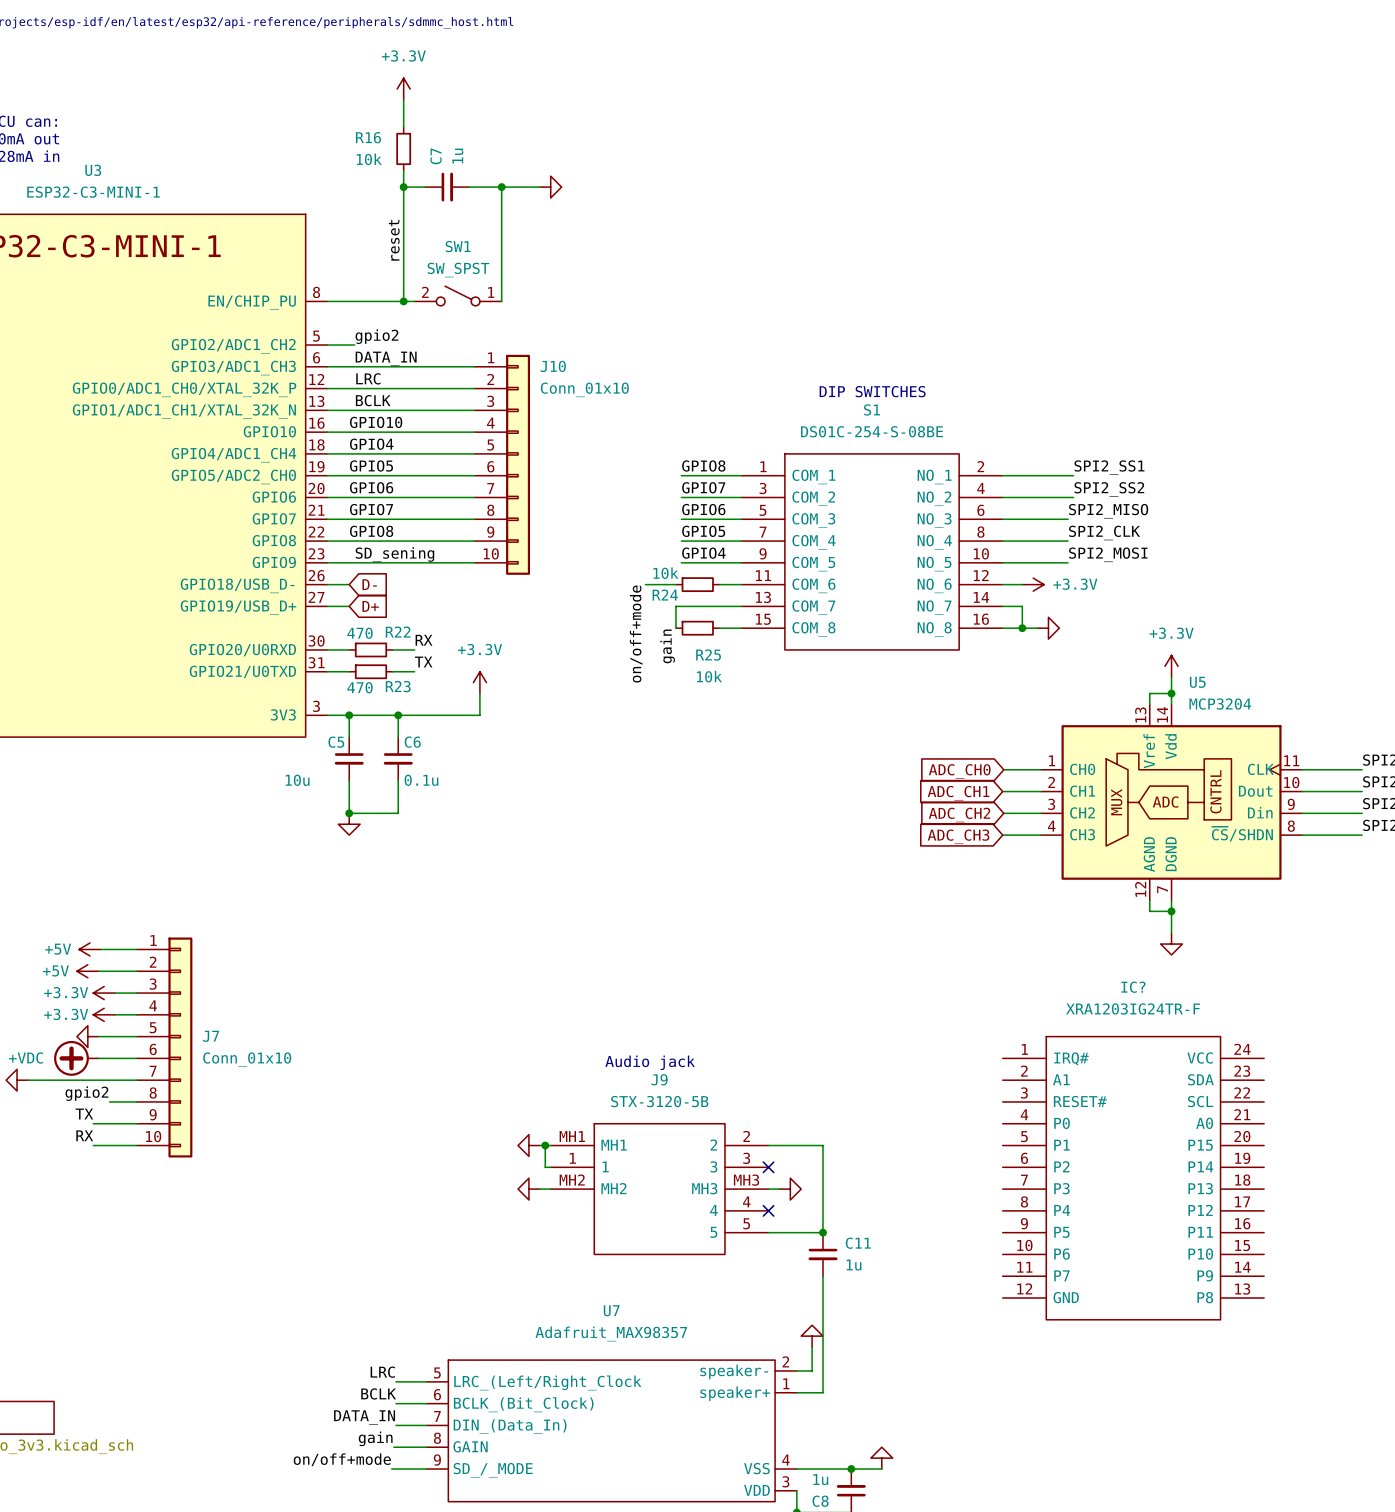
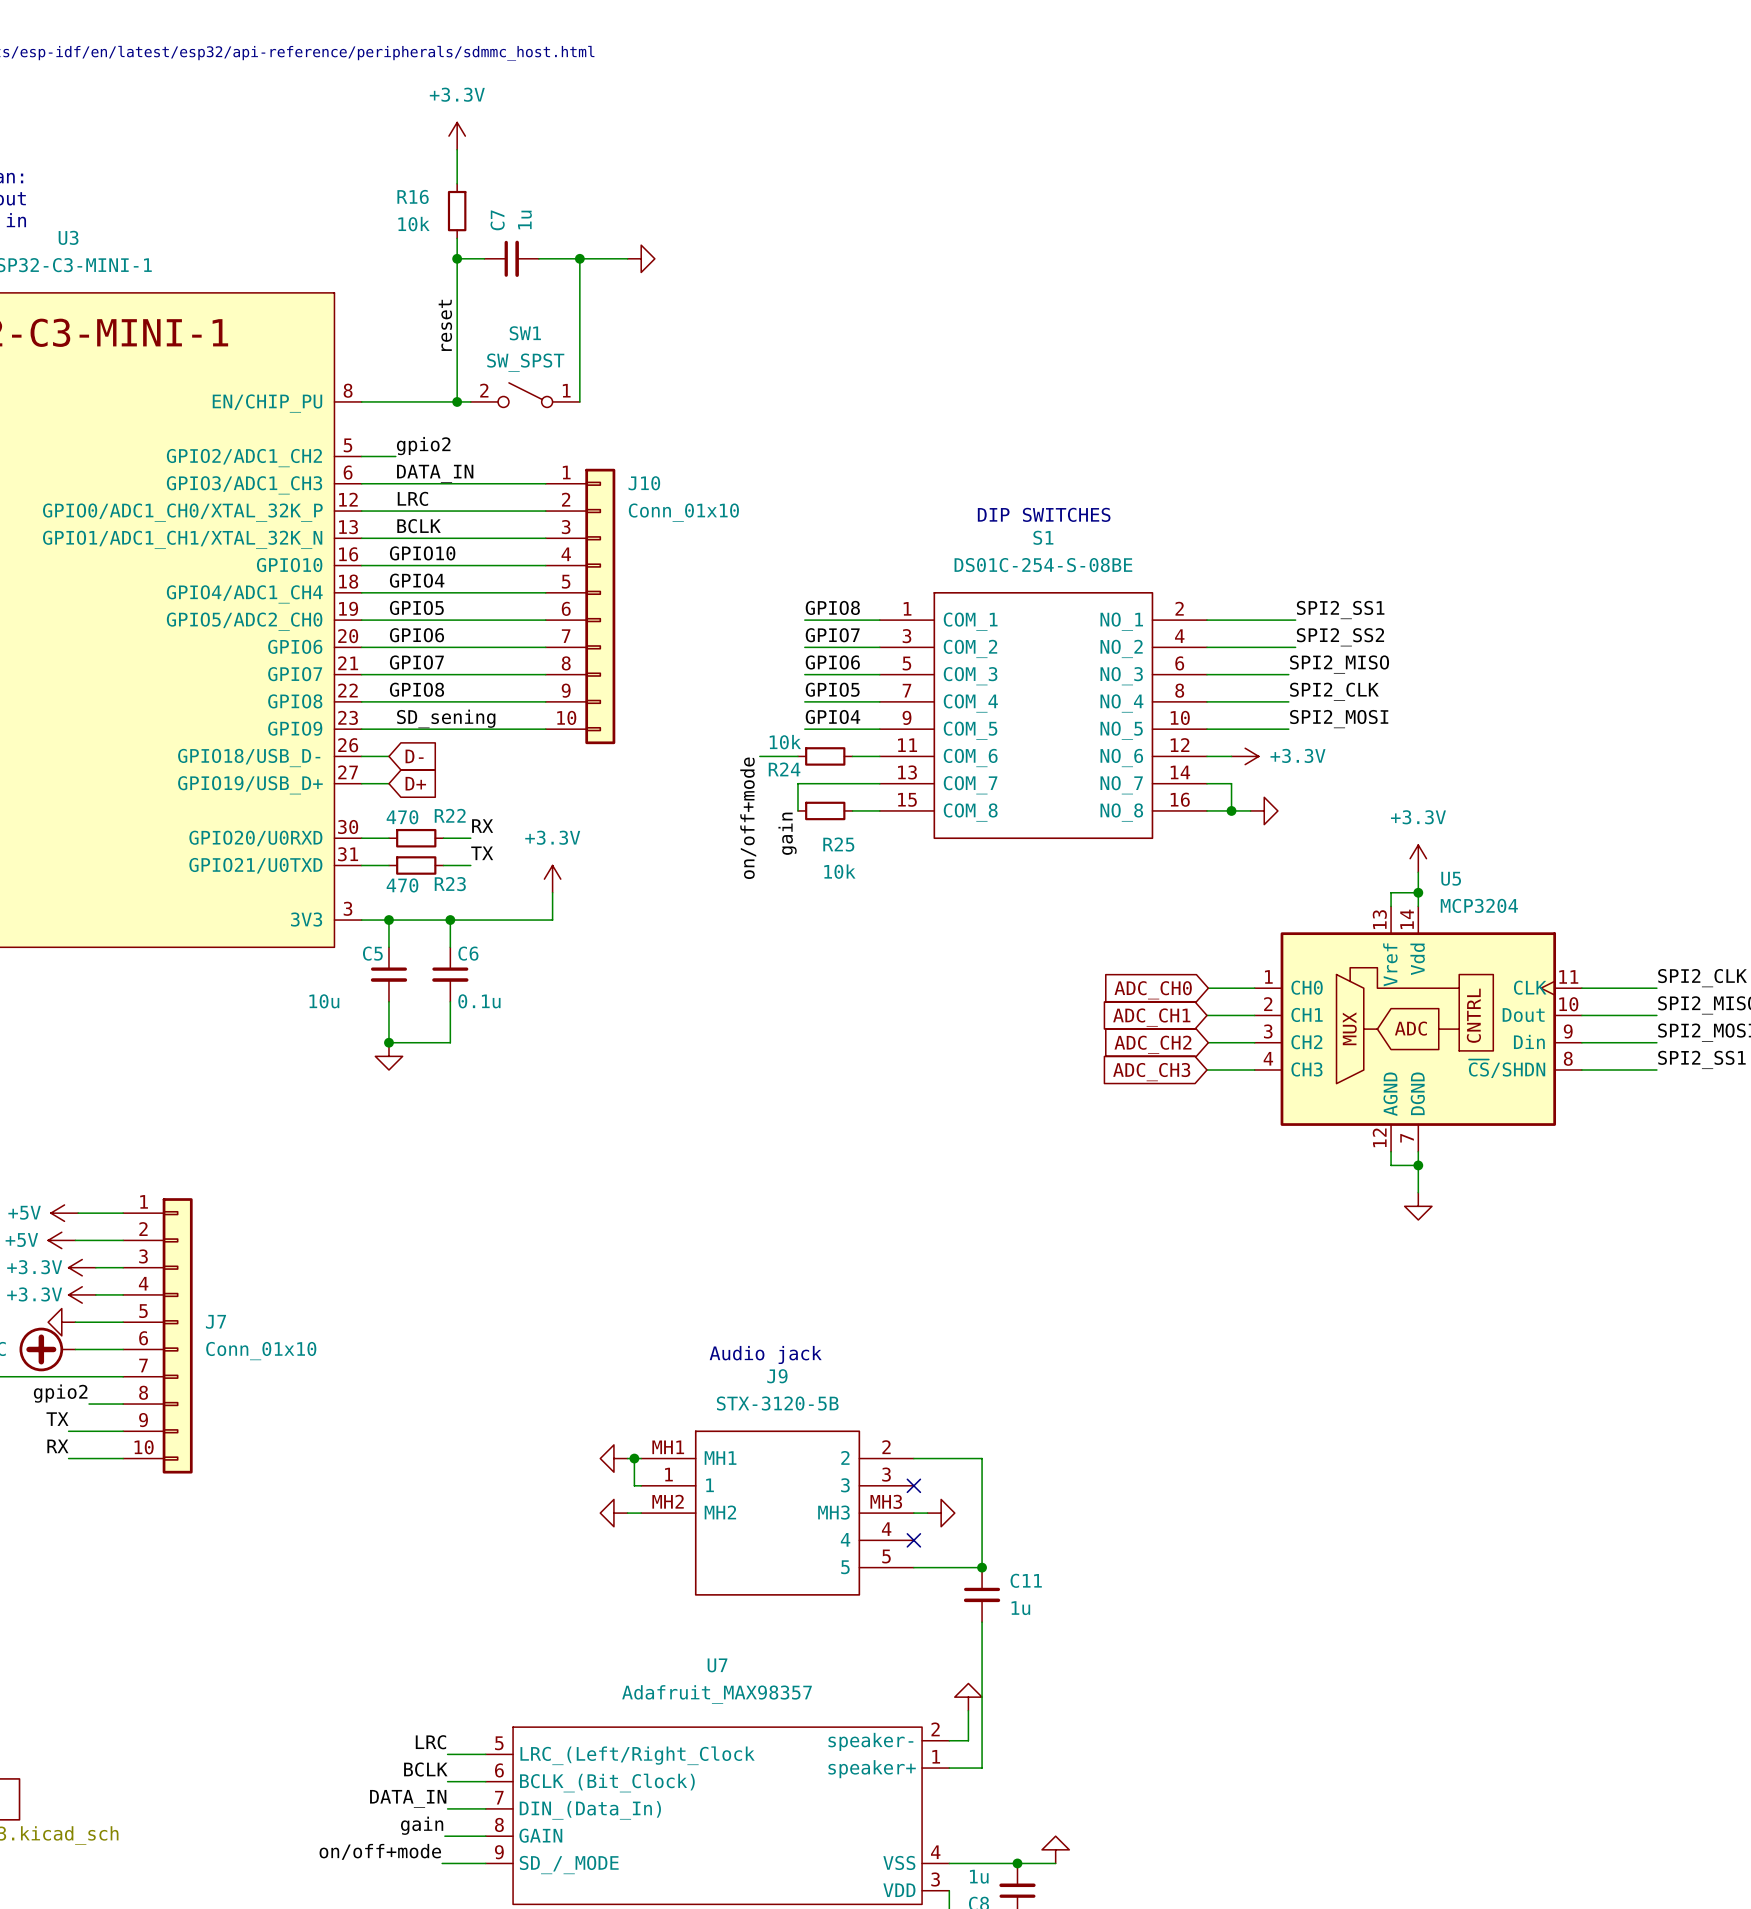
IC?: XRA1203IG24TR-F (1133, 1178) -> none

